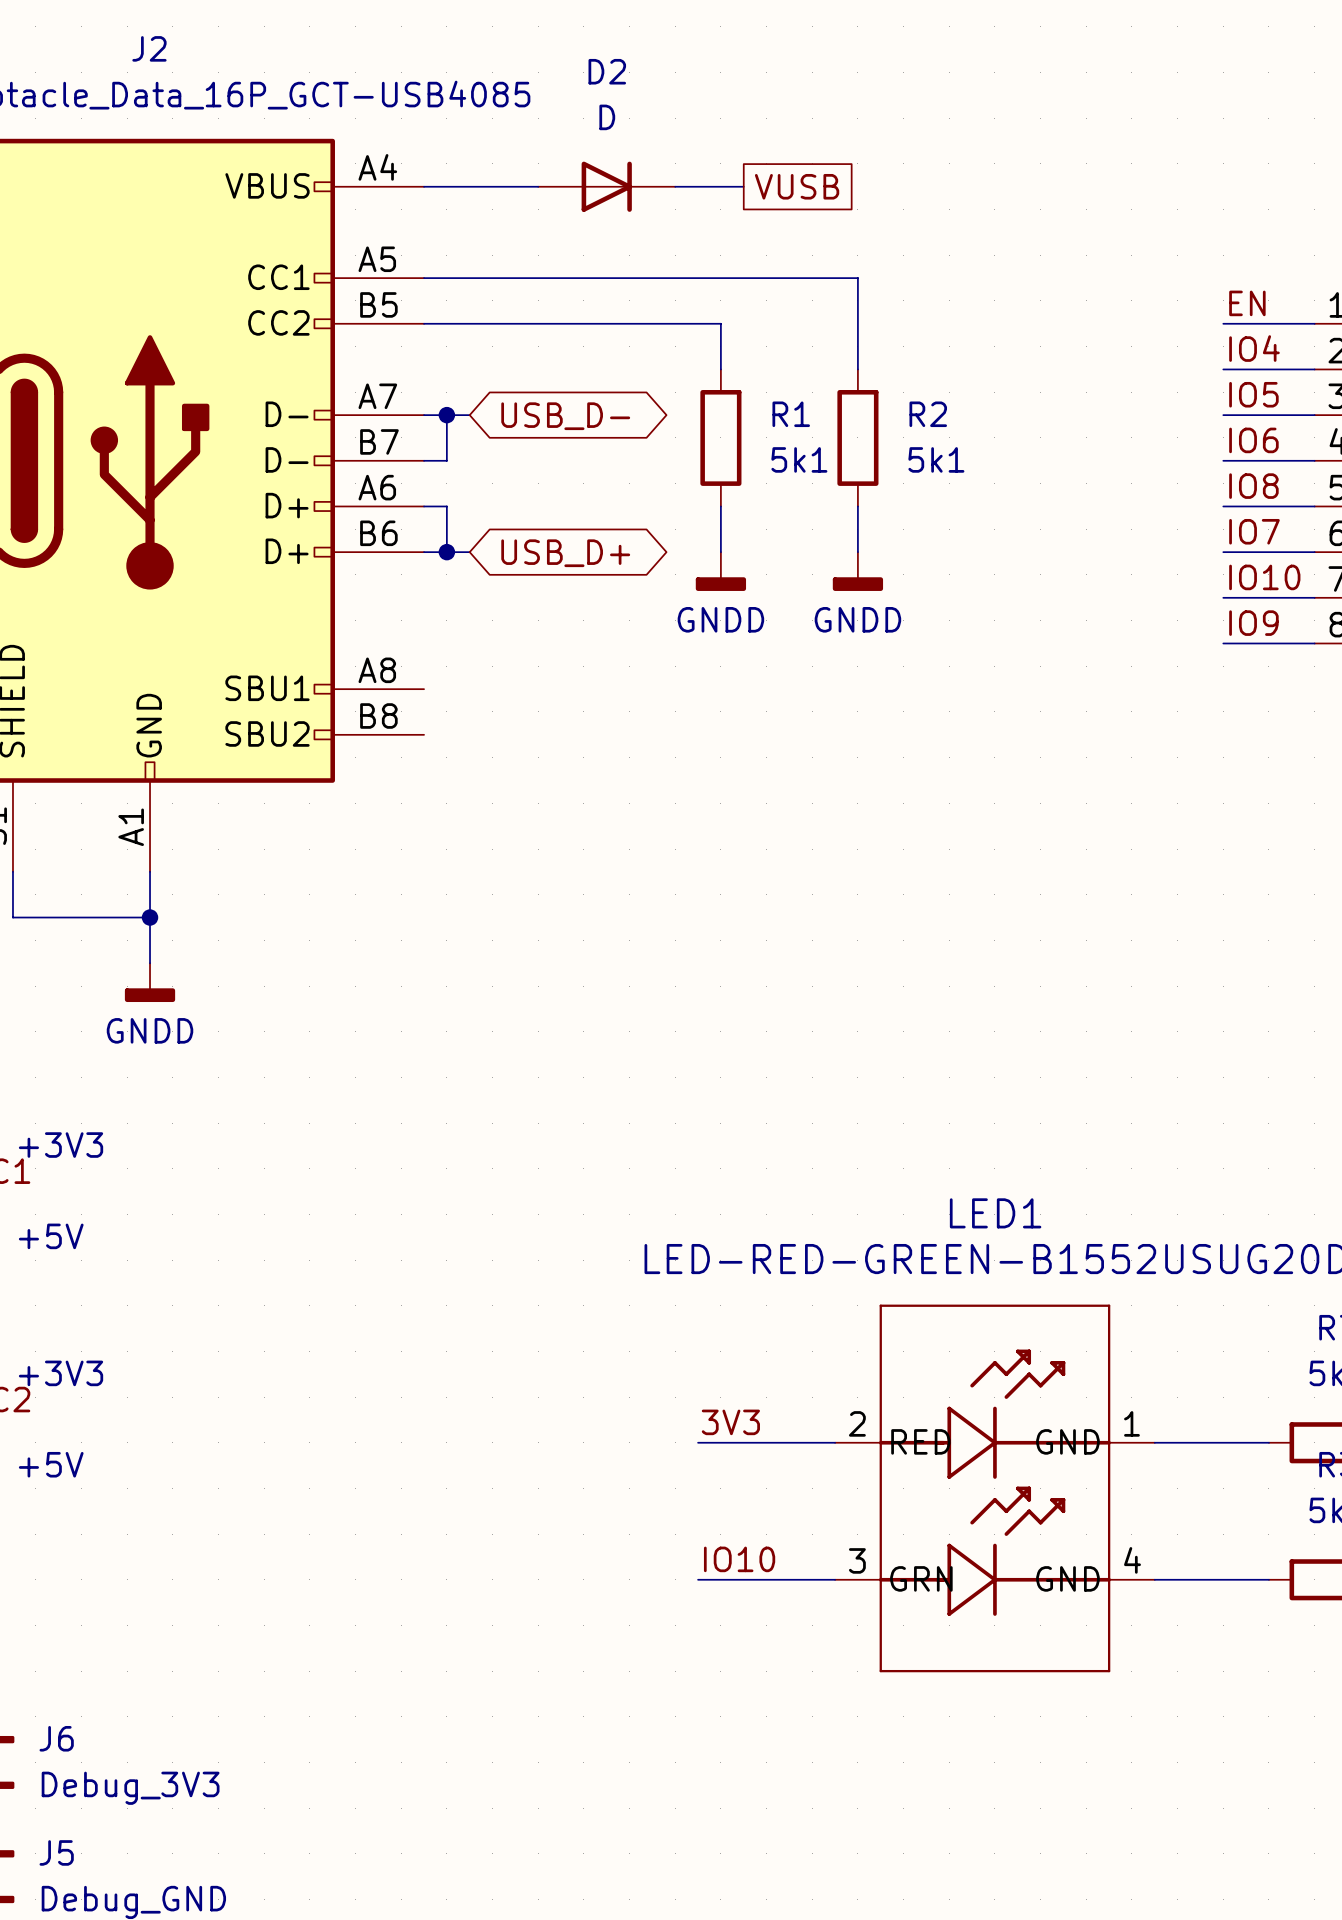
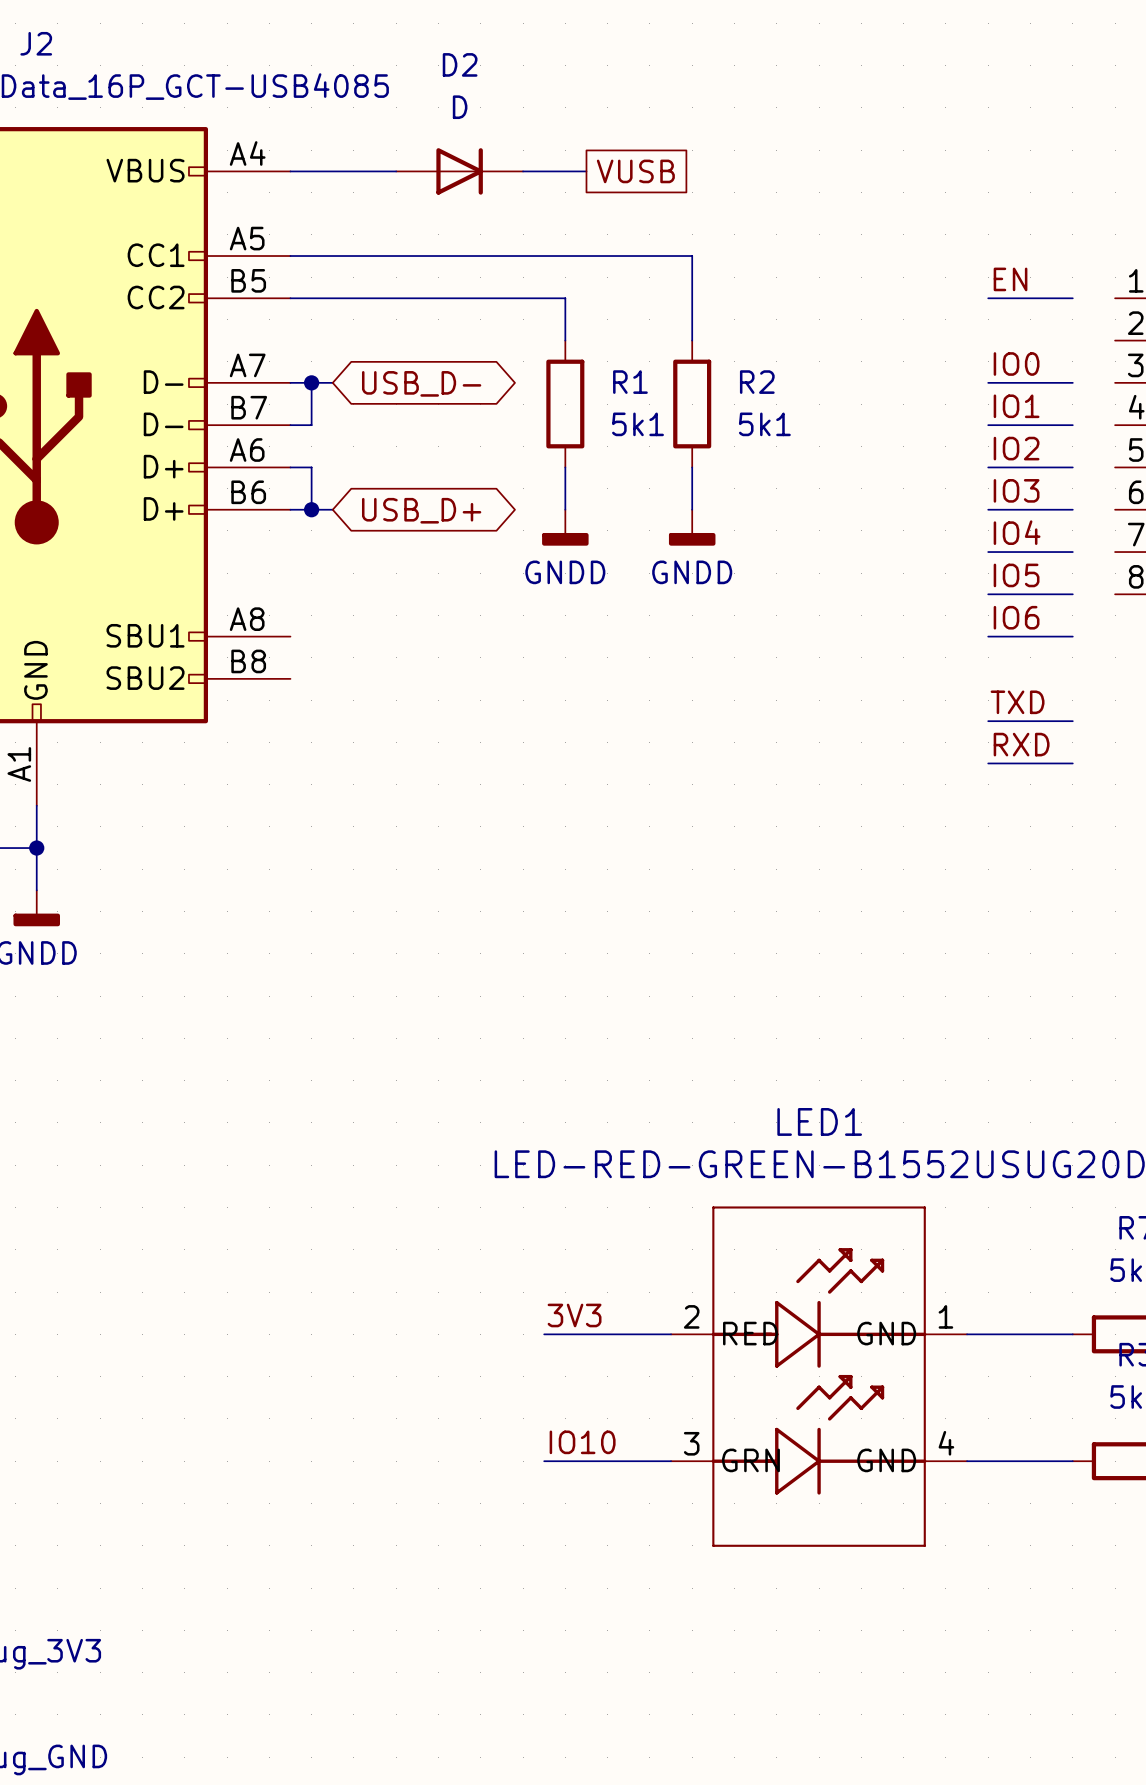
label position: EN (1247, 303) -> EN (1010, 279)
wire: (1268, 323) (1314, 323) -> (988, 298) (1030, 298)
label position: IO4 (1254, 348) -> IO4 (1017, 532)
wire: (1223, 369) (1314, 369) -> (988, 636) (1072, 636)
label: none -> IO0 (1016, 364)
label position: IO5 (1253, 394) -> IO5 (1016, 575)
wire: (1268, 415) (1314, 415) -> (988, 382) (1030, 382)
label: none -> IO1 (1016, 406)
label position: IO6 (1253, 440) -> IO6 (1016, 617)
wire: (1268, 460) (1314, 460) -> (988, 425) (1030, 425)
label: none -> IO2 (1016, 448)
label: IO8 (1253, 486) -> none
wire: (1268, 506) (1314, 506) -> (988, 467) (1030, 467)
label: none -> IO3 (1016, 490)
label: IO7 (1254, 531) -> none
wire: (1268, 552) (1314, 552) -> (988, 509) (1030, 509)
label: IO10 (1264, 577) -> none
wire: (1268, 597) (1314, 597) -> (988, 552) (1030, 552)
label: IO9 (1253, 623) -> none
wire: (1268, 643) (1314, 643) -> (988, 594) (1030, 594)
label: none -> TXD (1017, 702)
wire: none -> (988, 721) (1072, 721)
label: none -> RXD (1021, 744)
wire: none -> (988, 763) (1072, 763)

